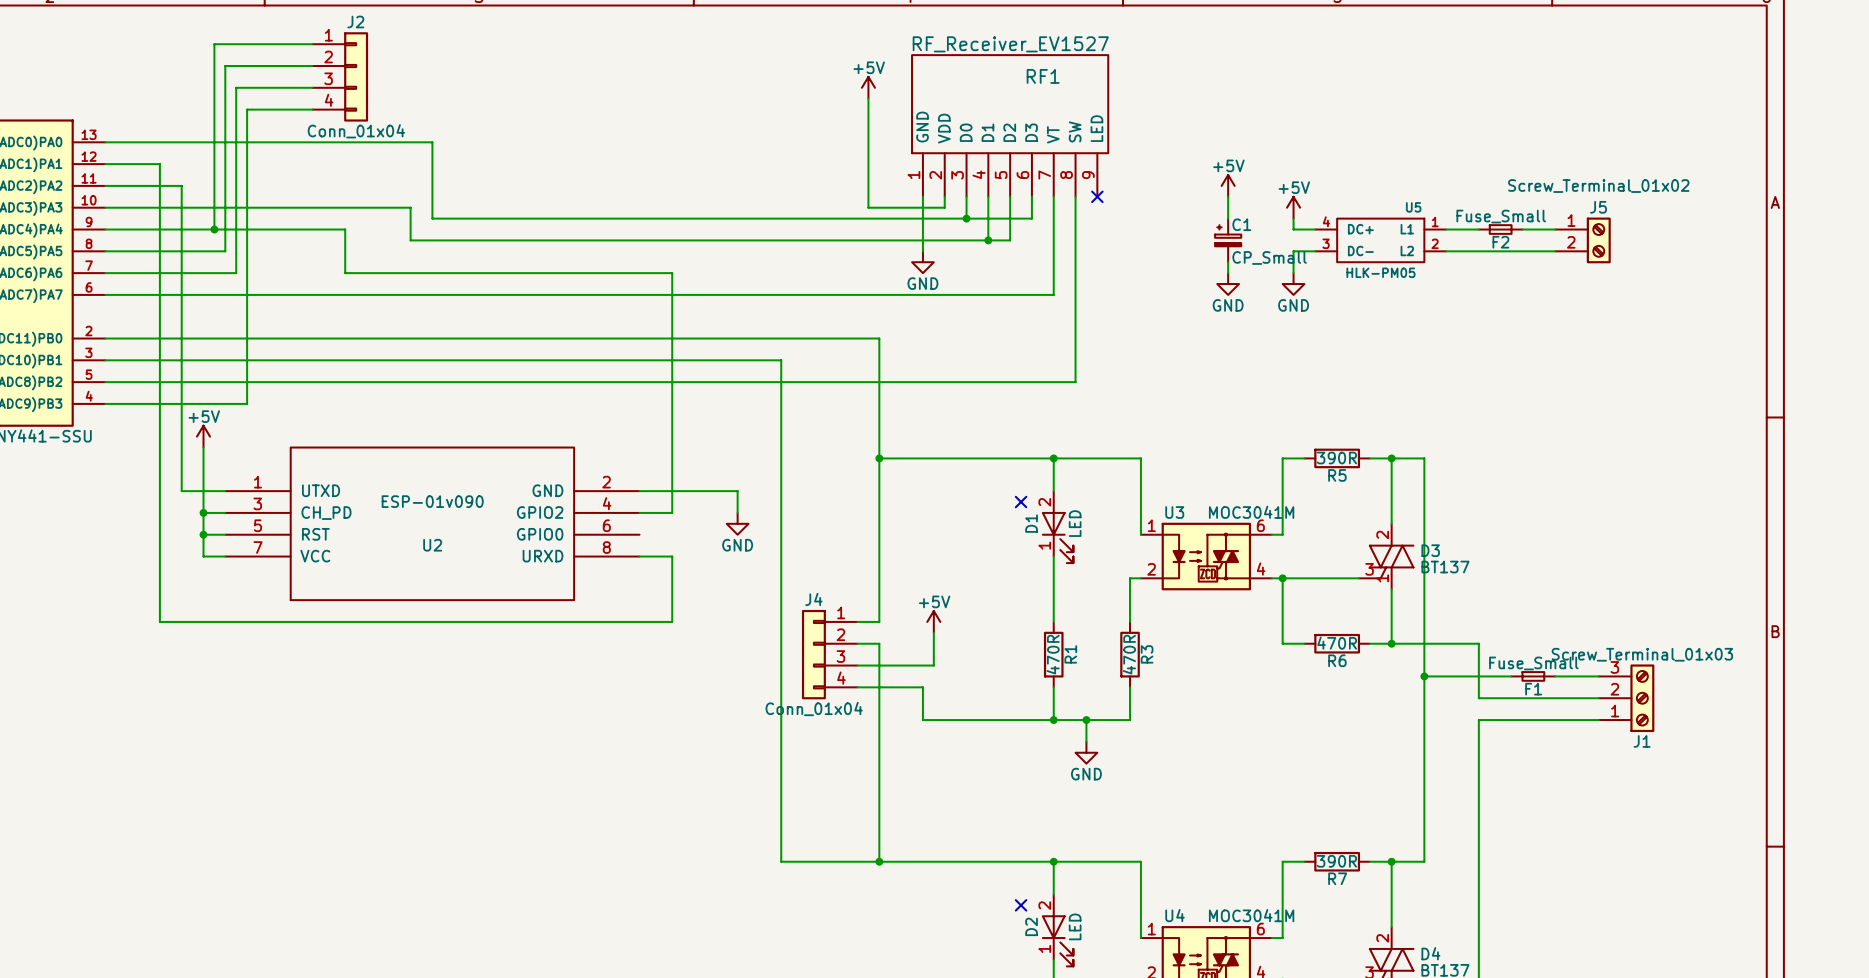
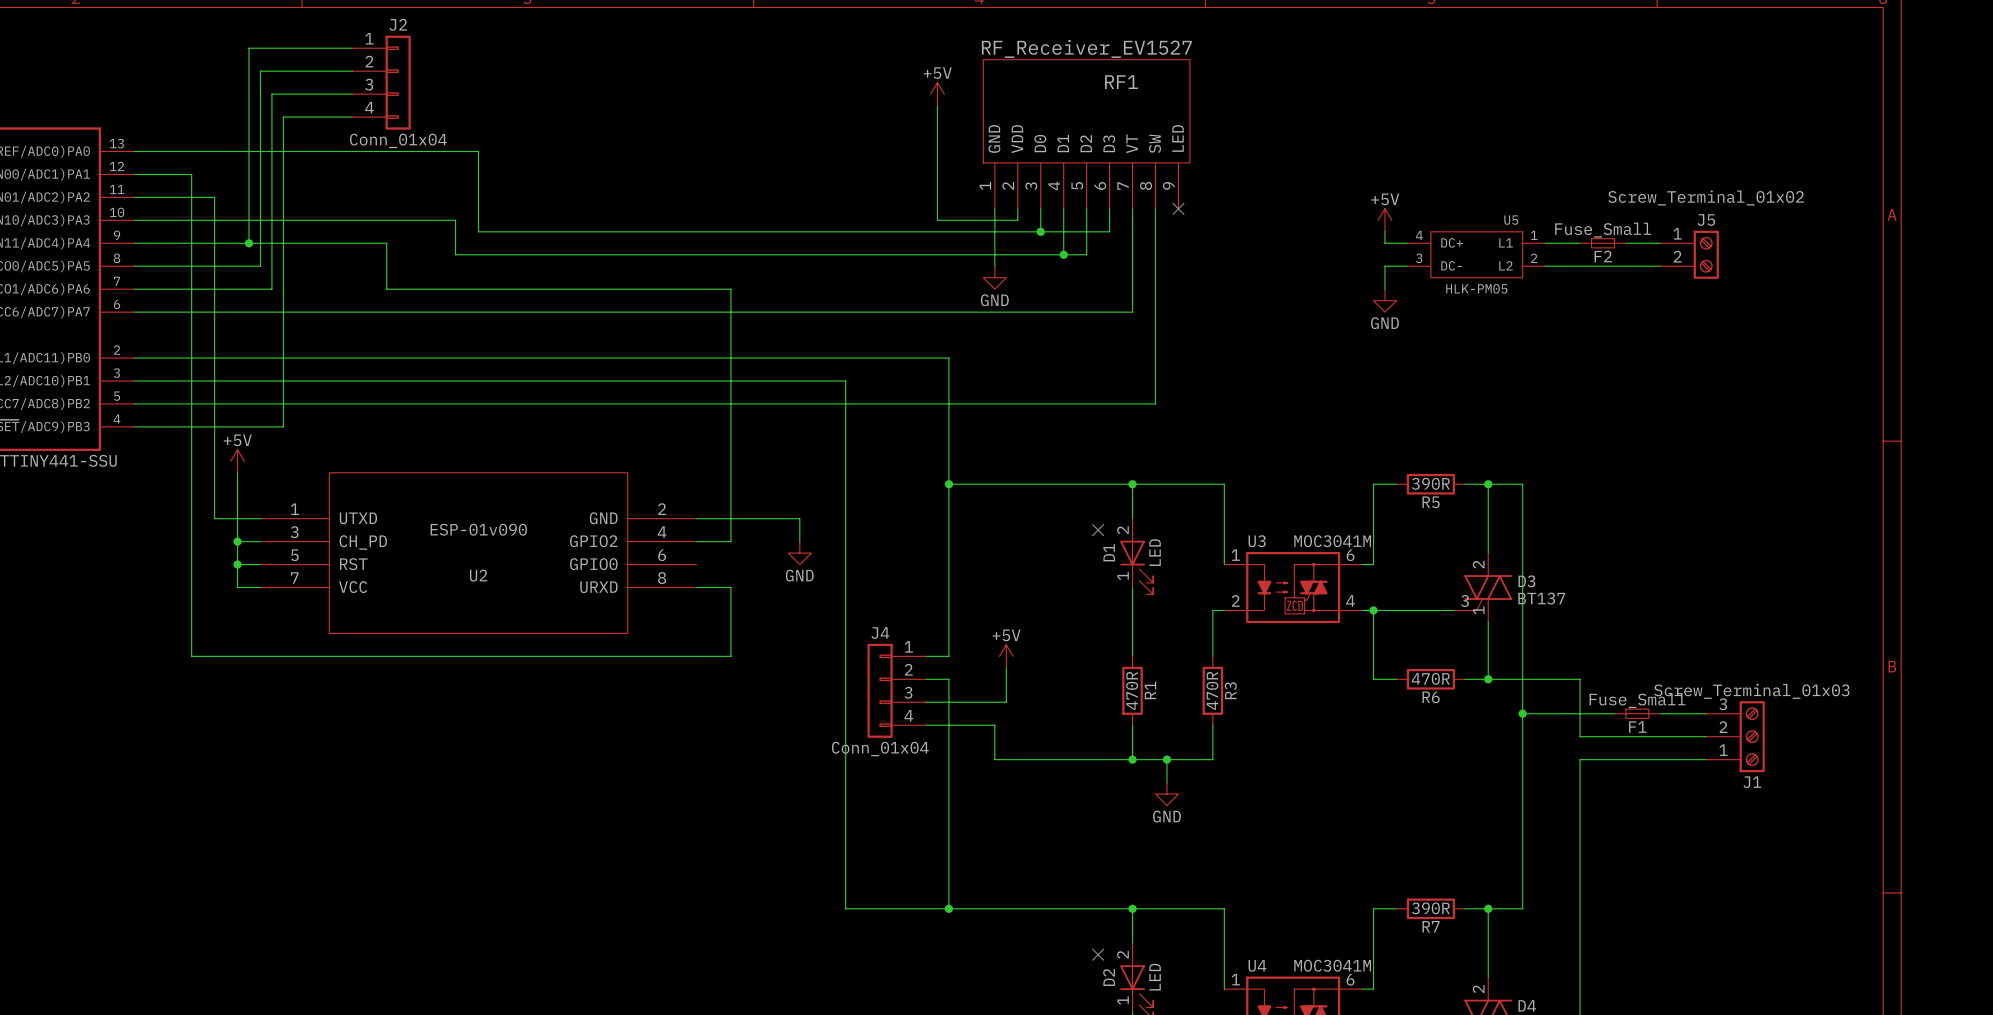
power symbol: +5V (1228, 185) -> none
wire: (1228, 196) (1228, 218) -> none
C1: CP_Small (1228, 240) -> none
wire: (1228, 262) (1228, 273) -> none
power symbol: GND (1228, 284) -> none

